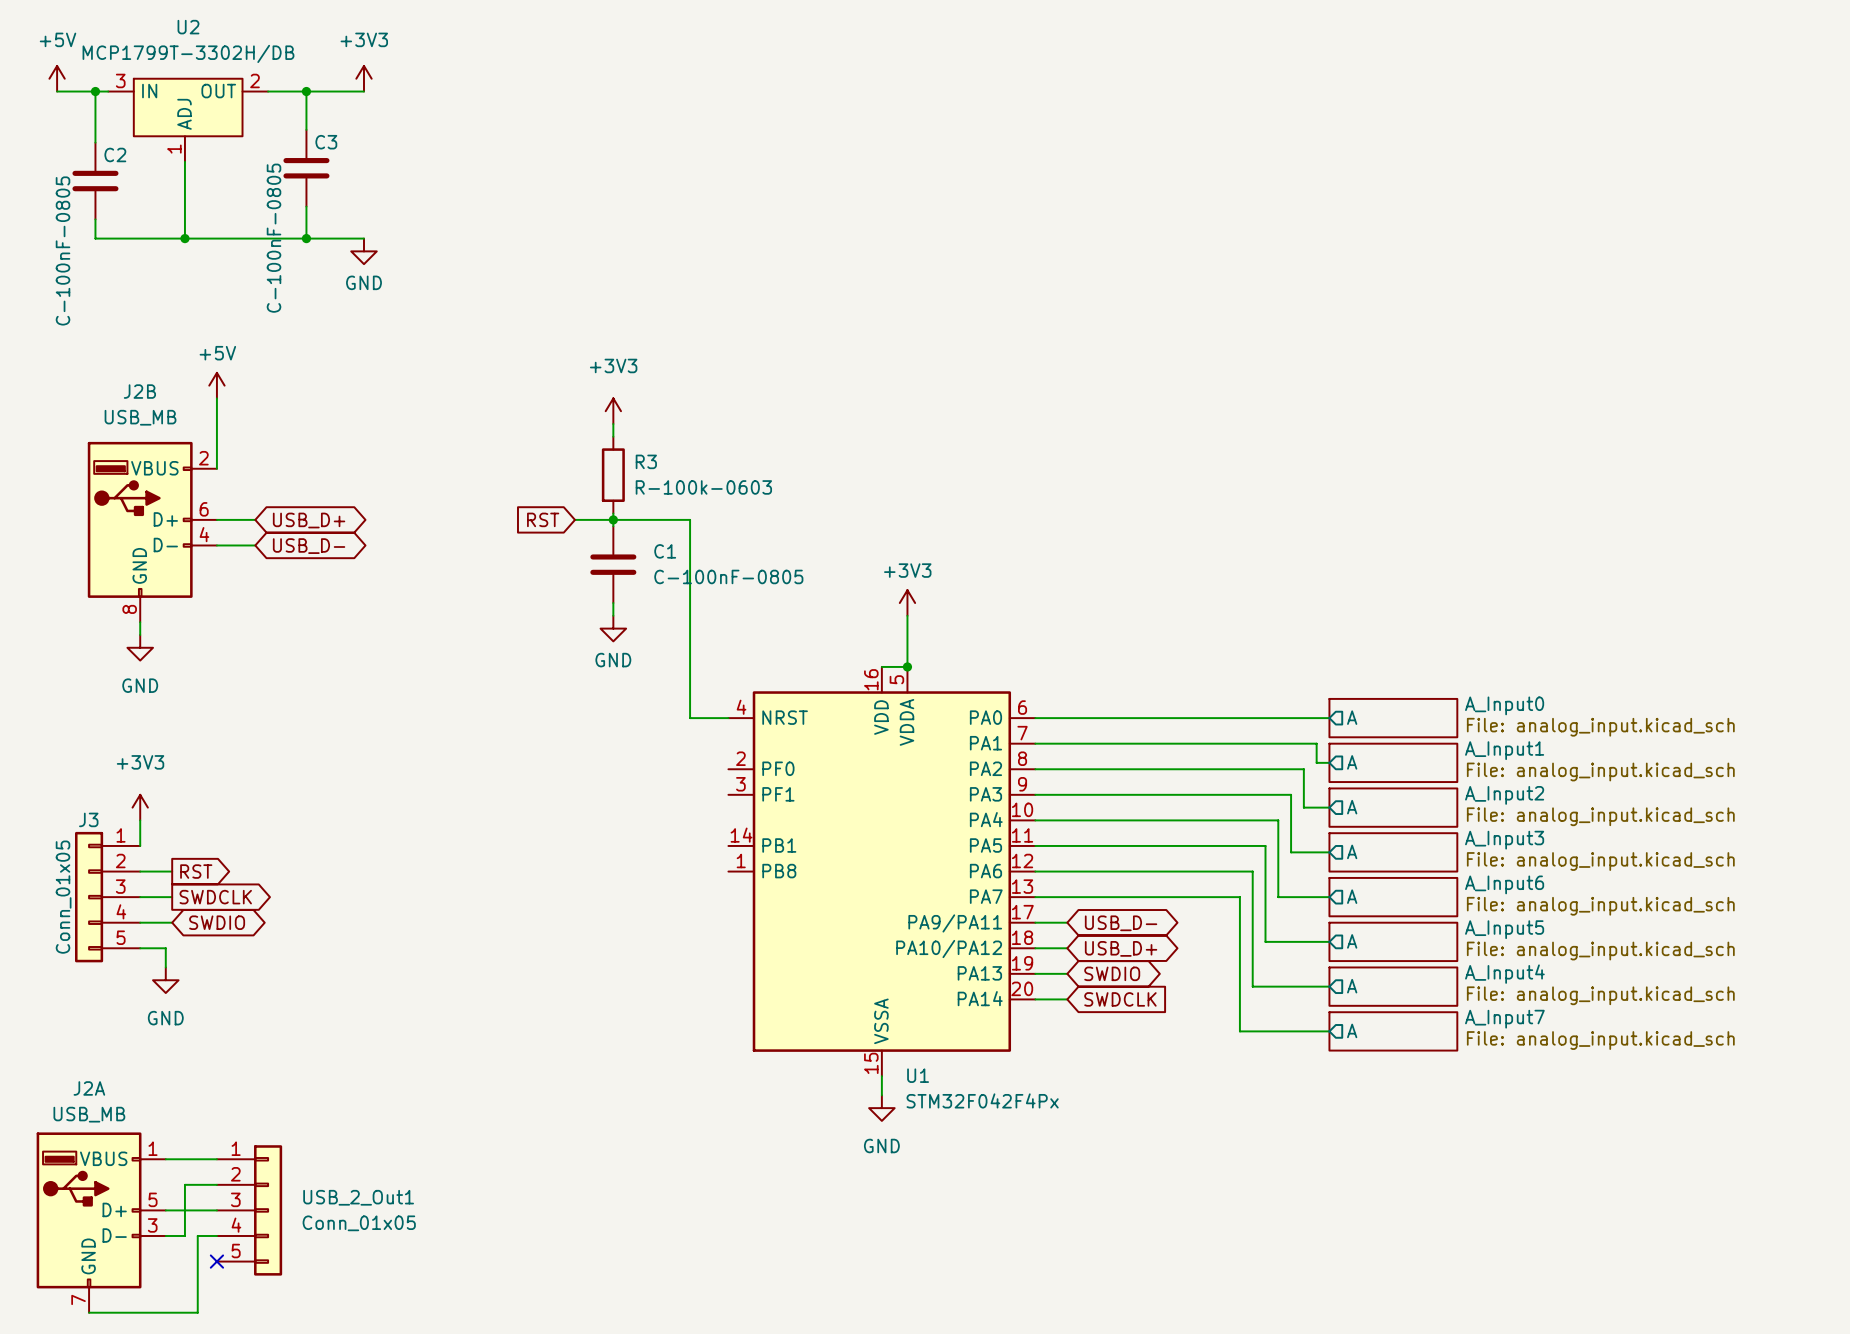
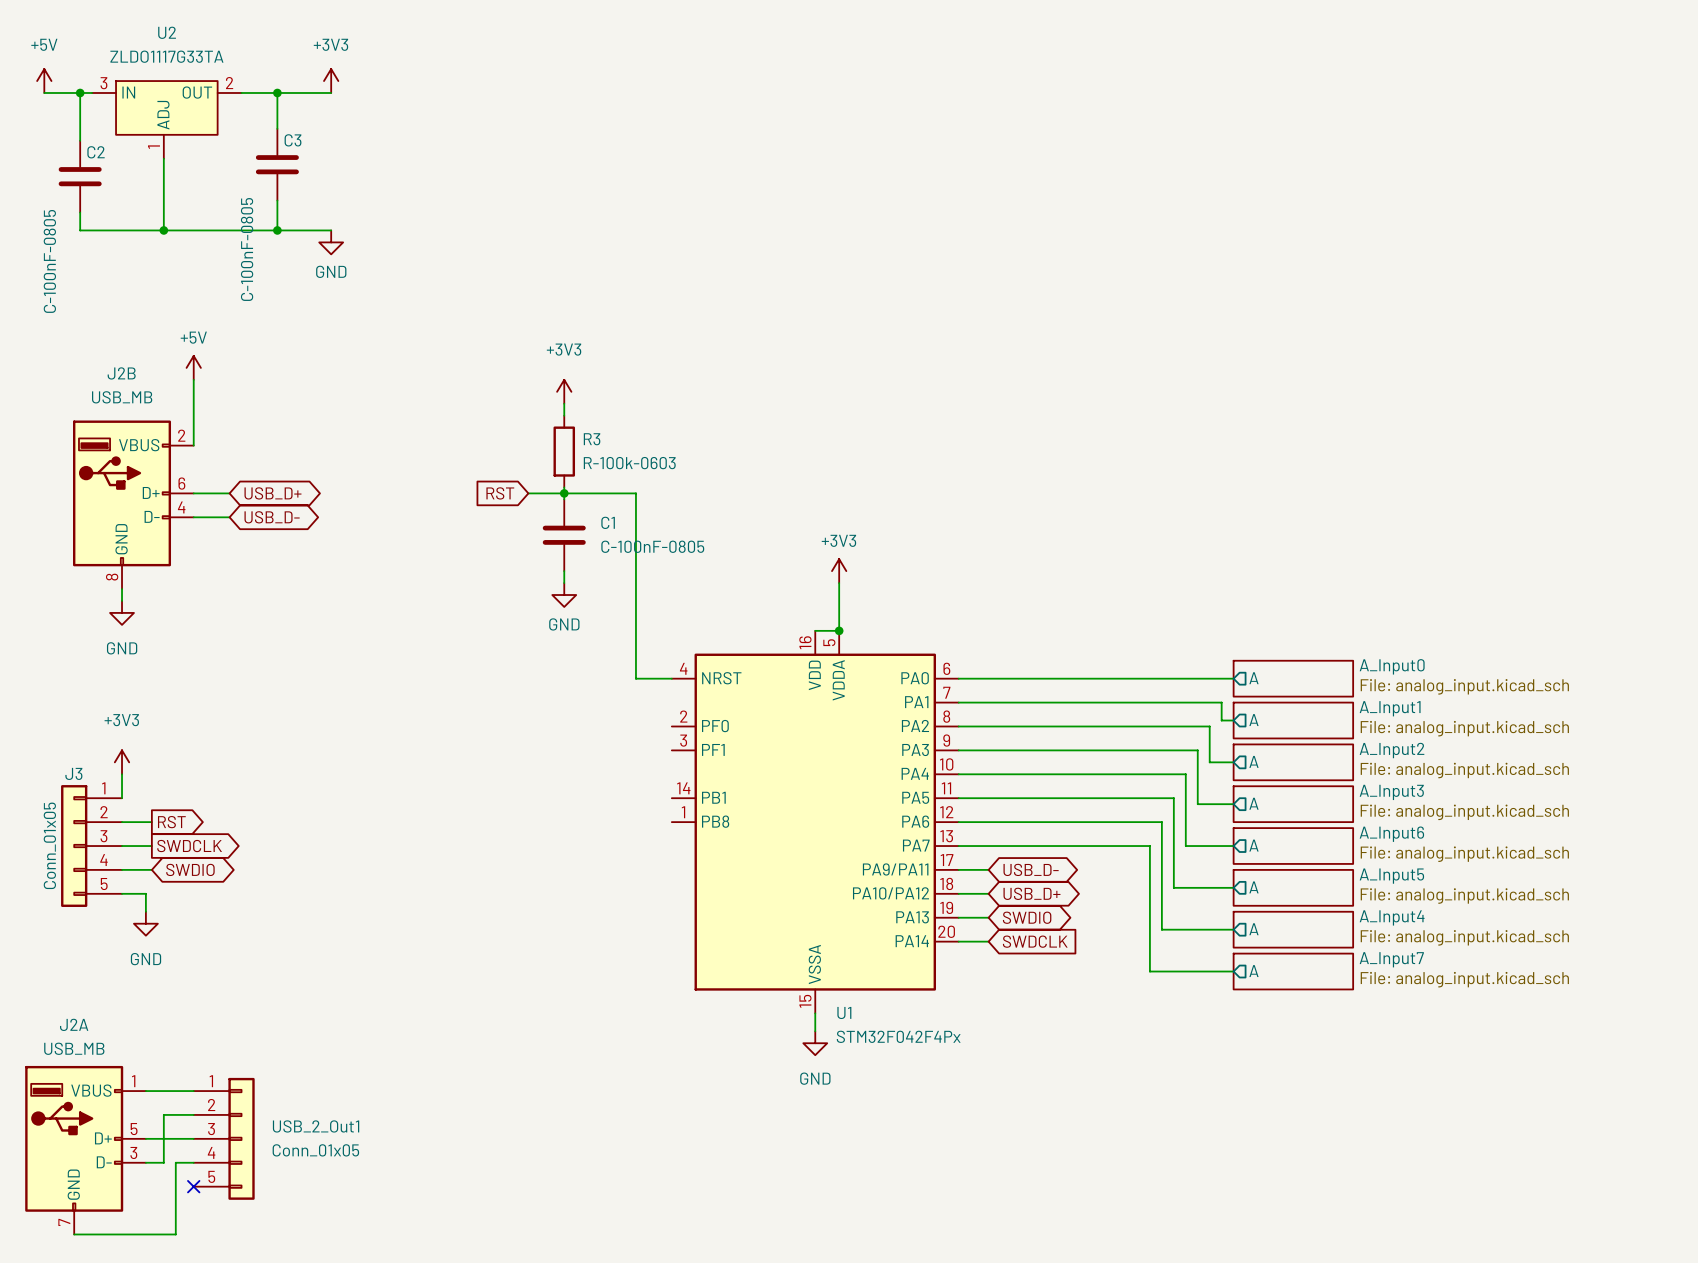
U2 value: MCP1799T-3302H/DB (188, 53) -> ZLDO1117G33TA (166, 56)

